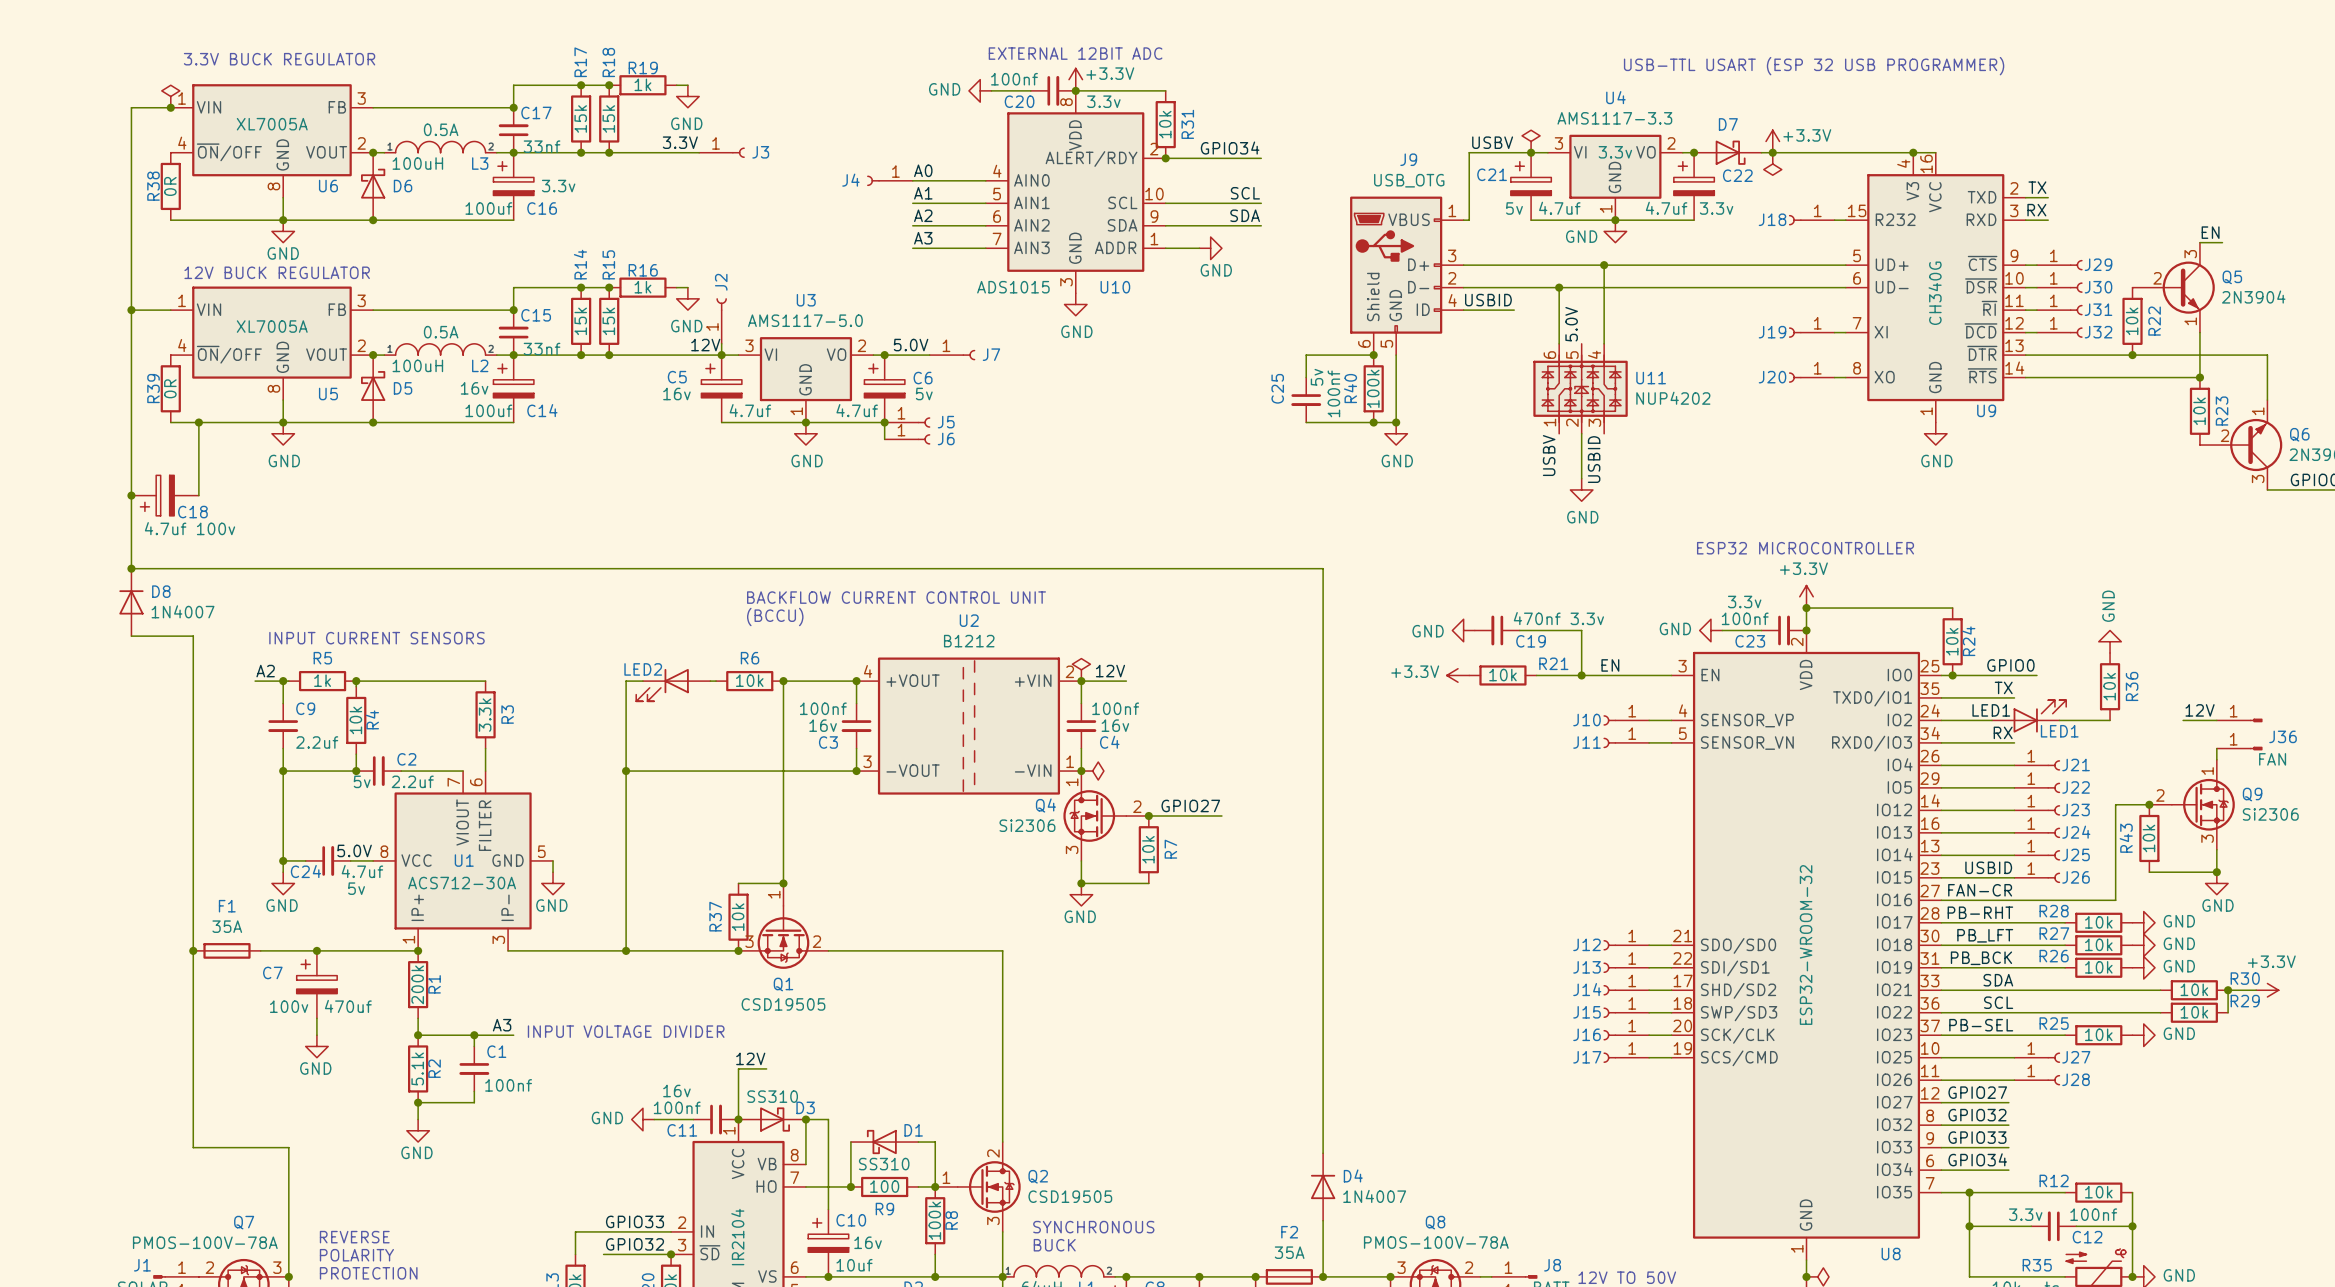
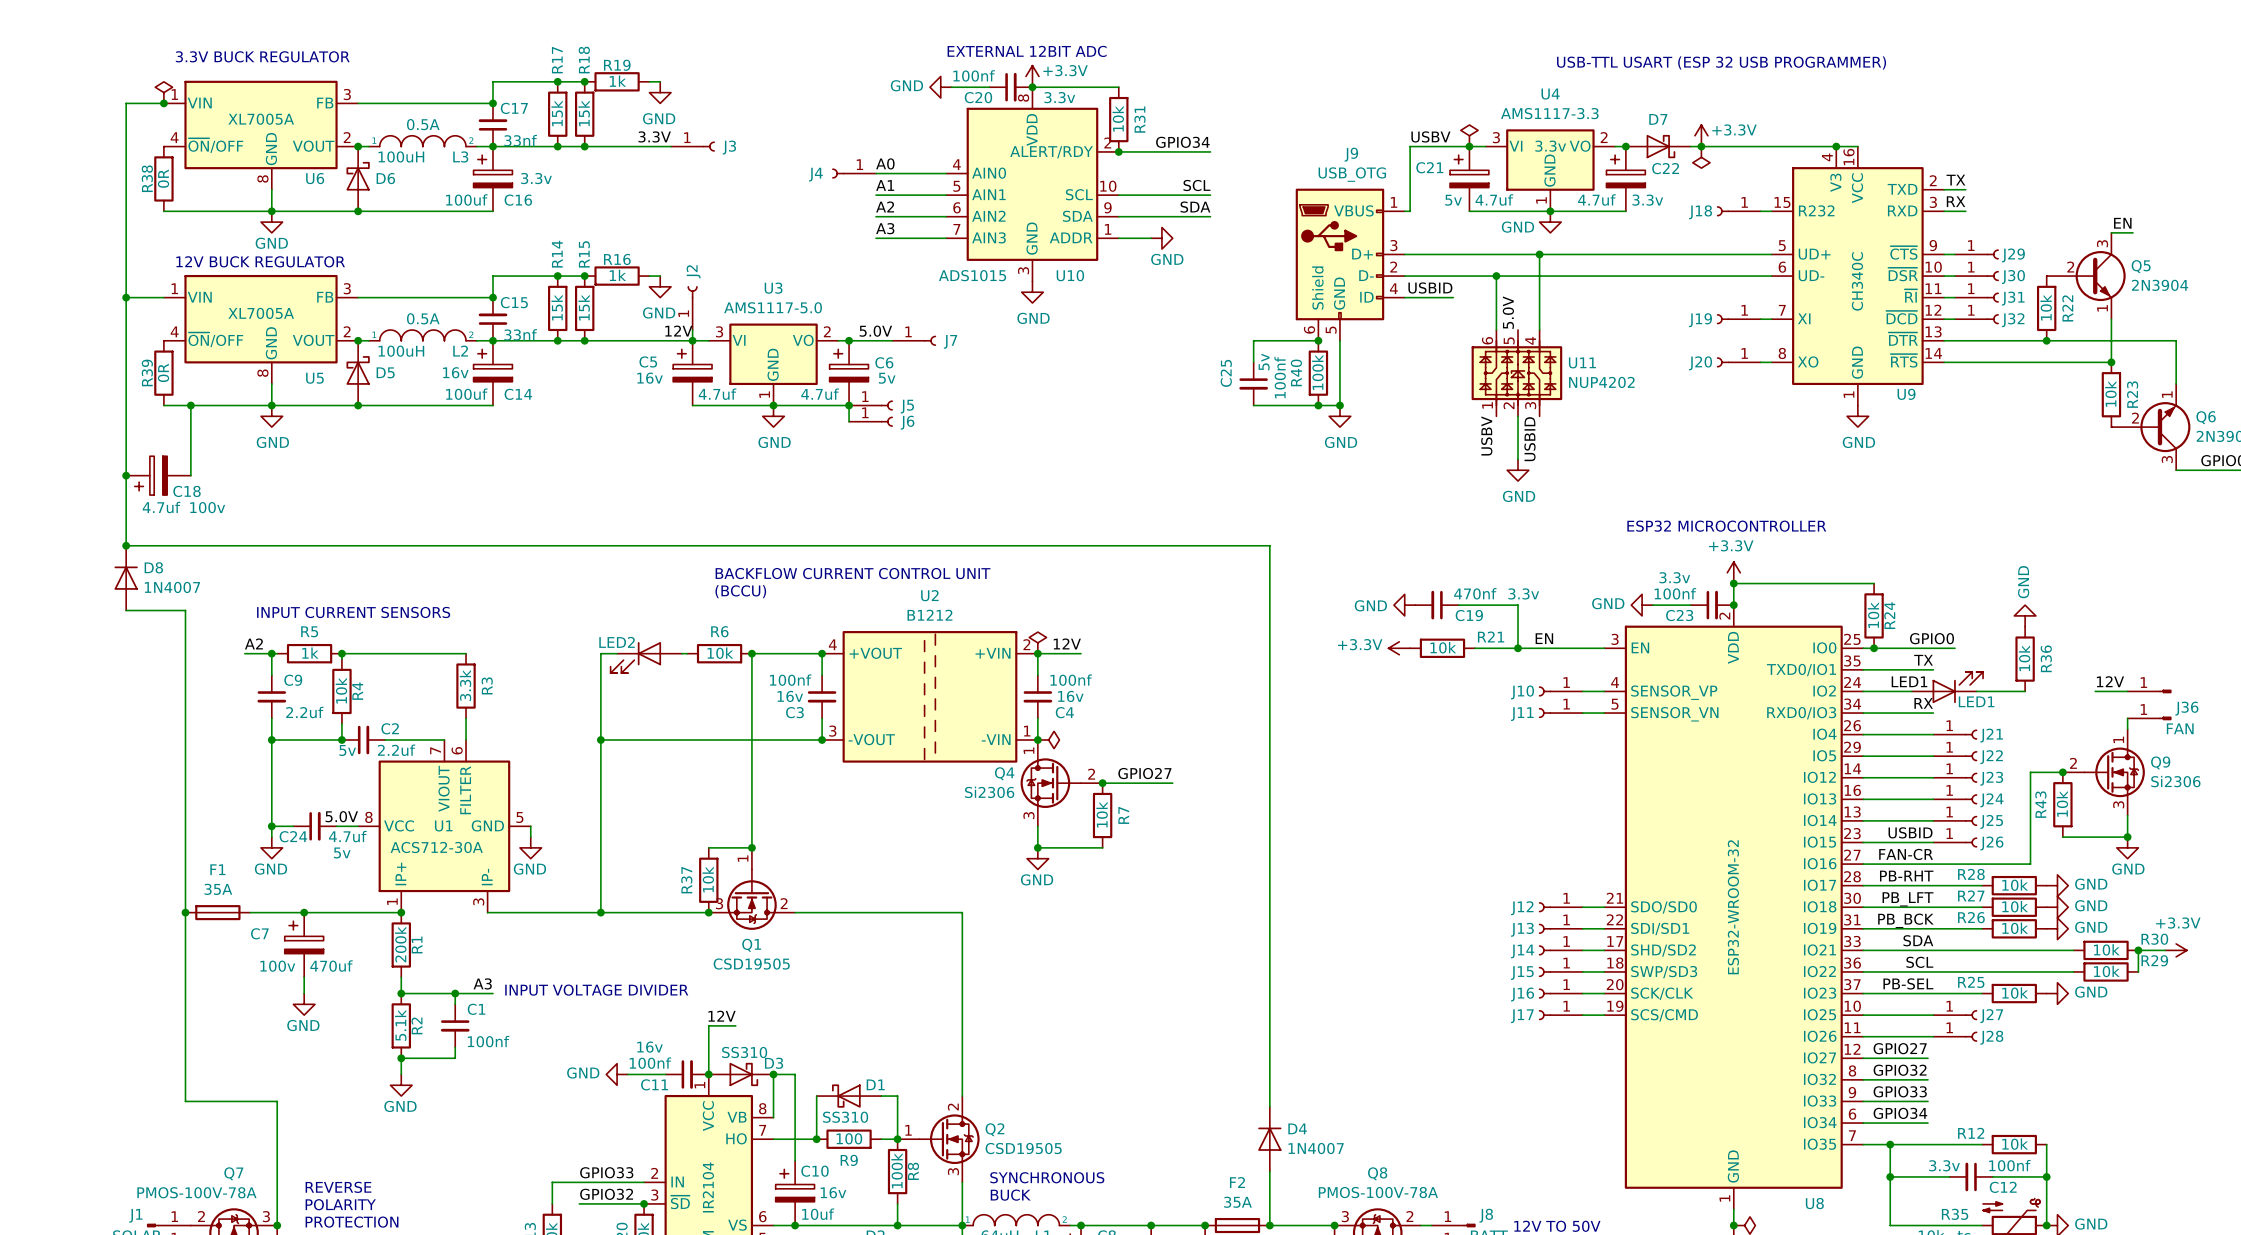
U9 value: CH340G (1935, 293) -> CH340C (1857, 281)

